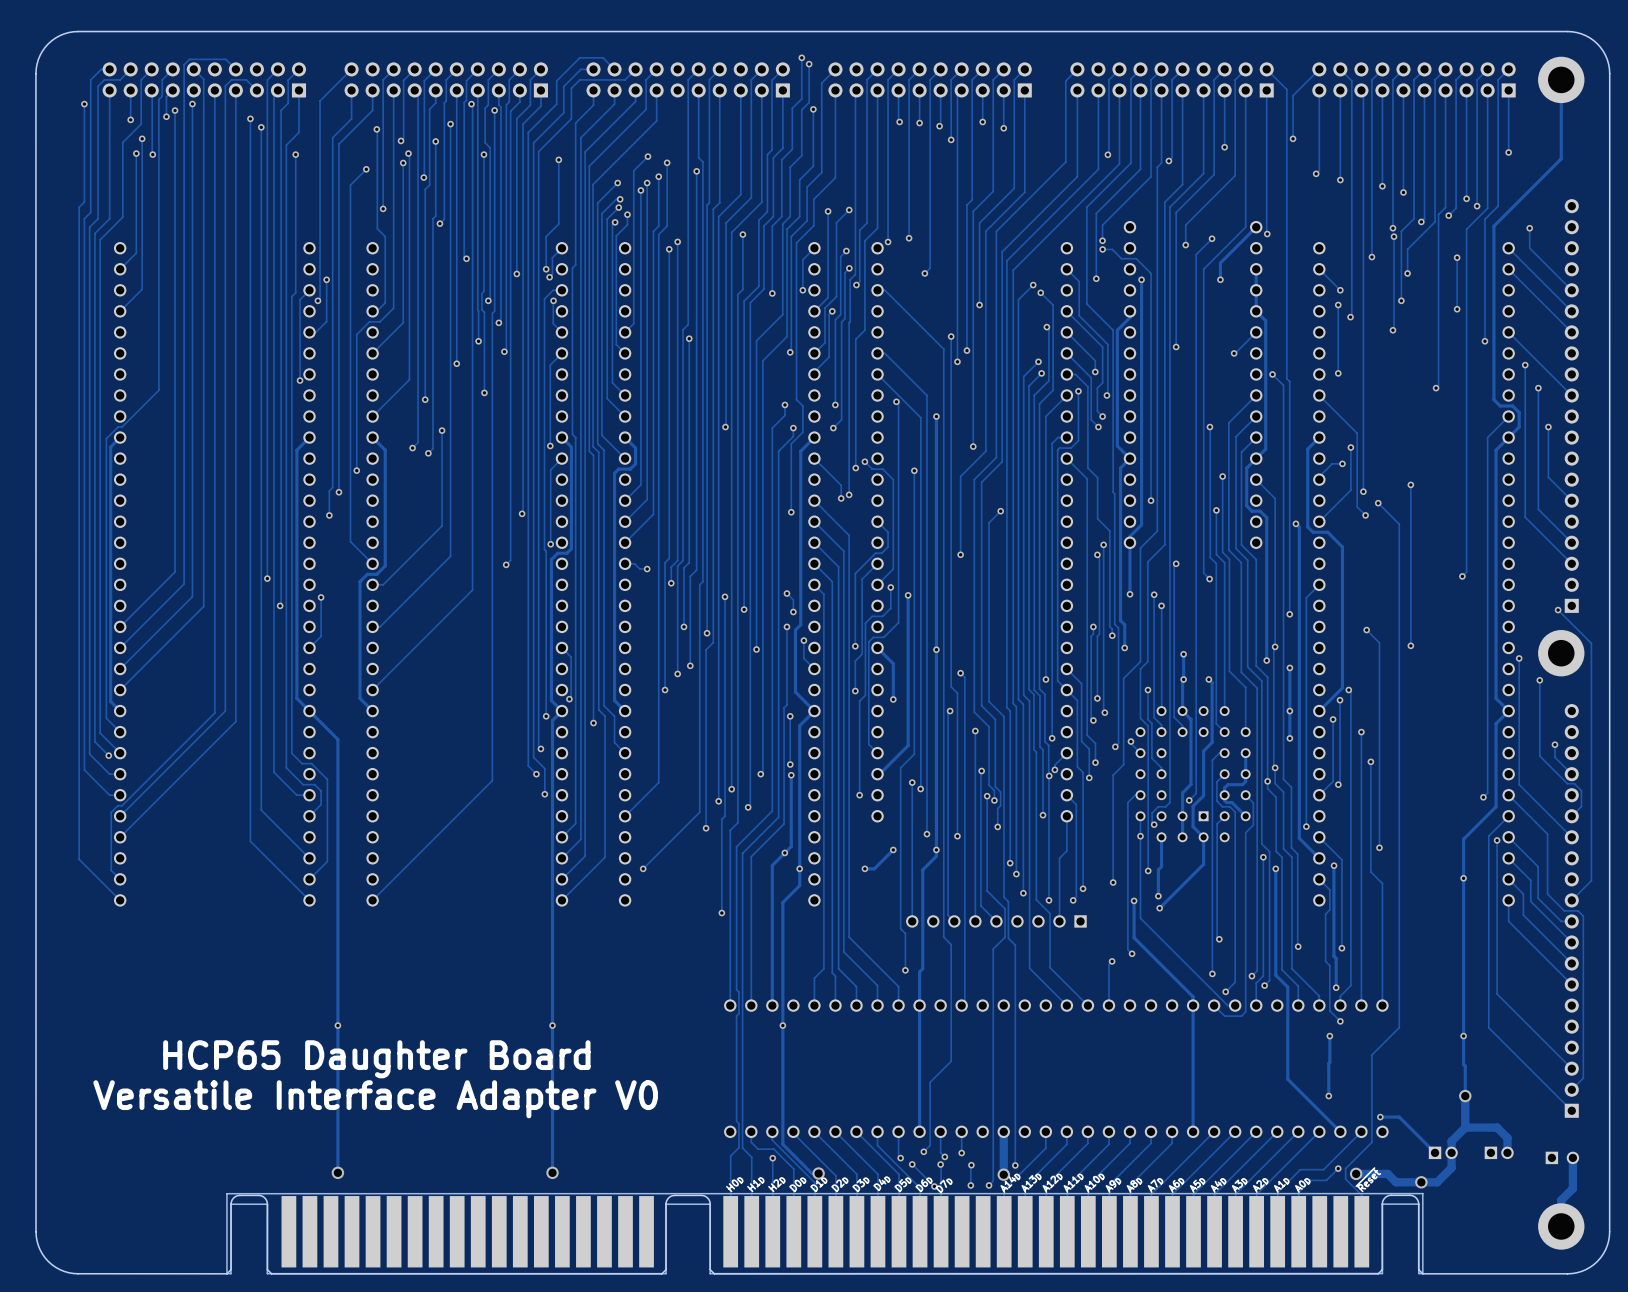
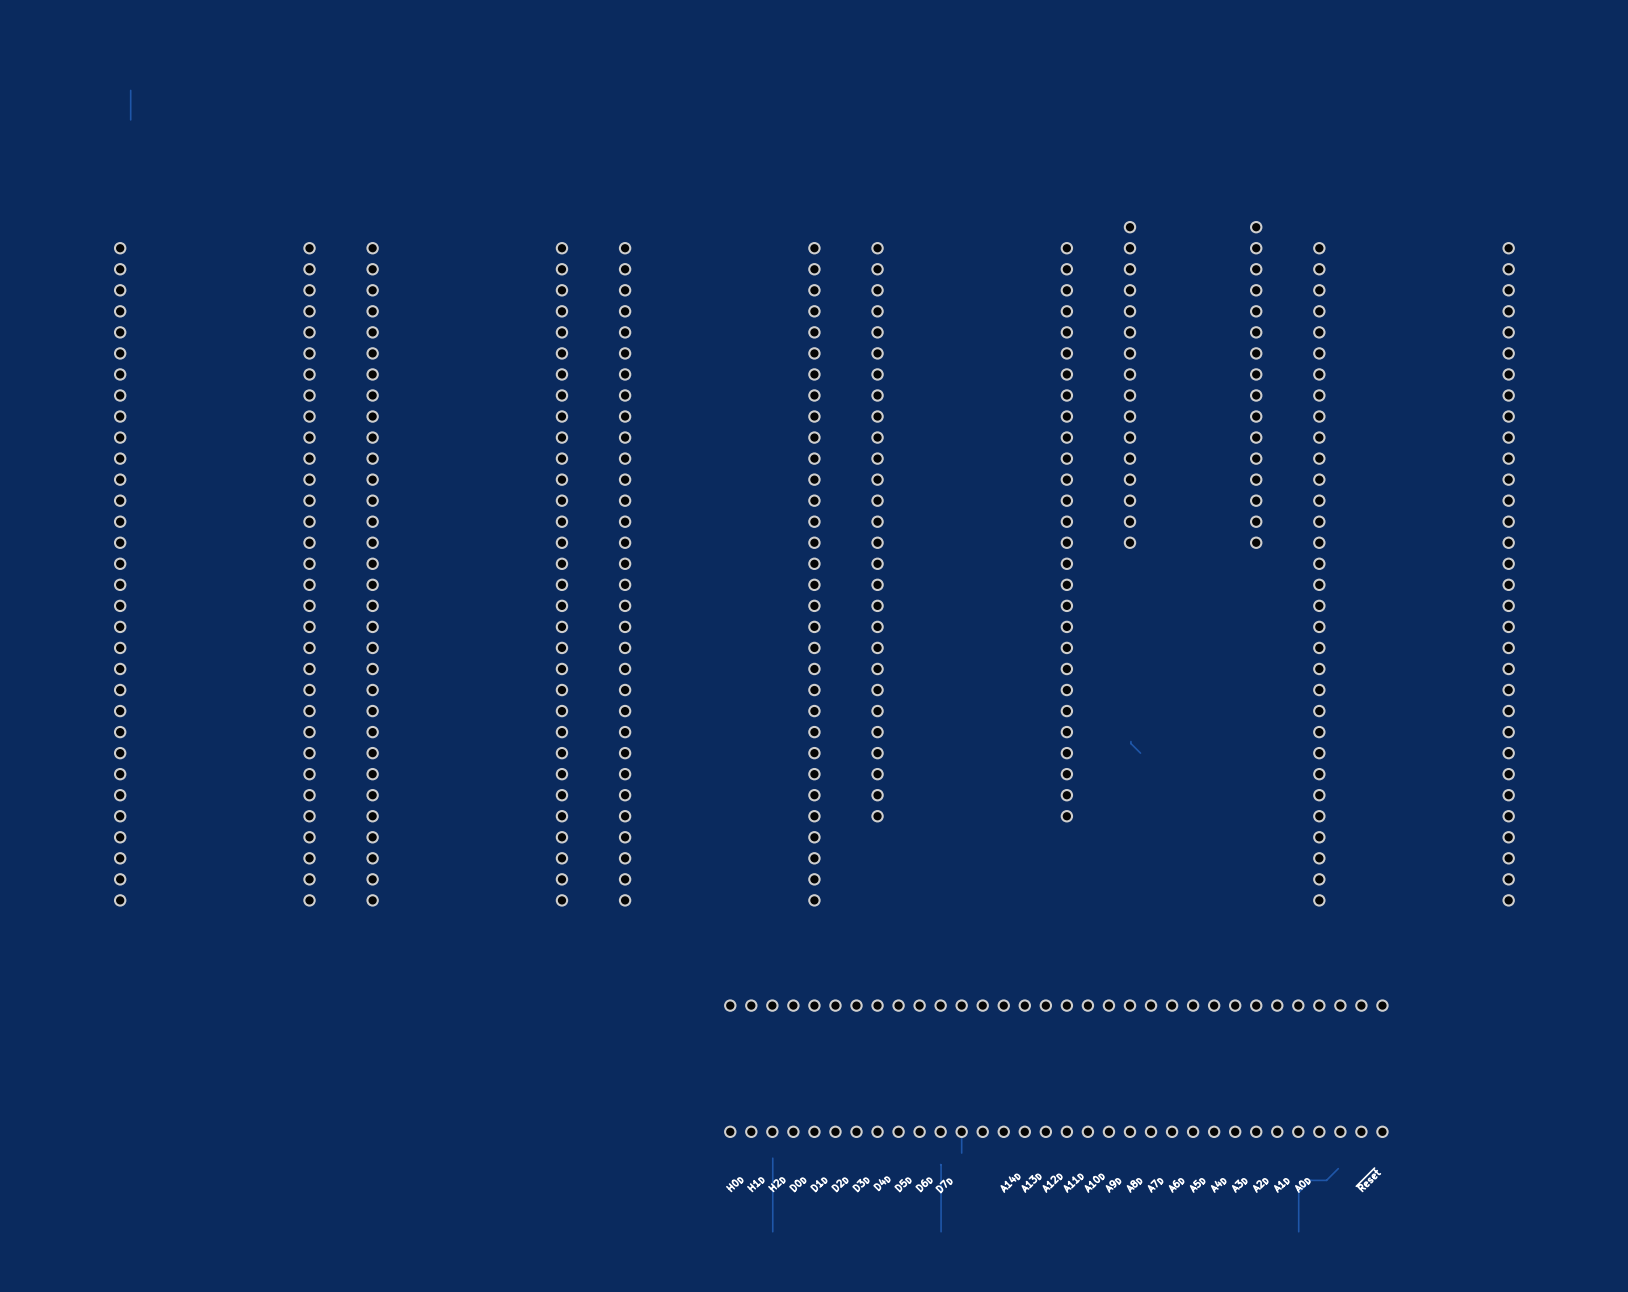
track: (801, 57) (801, 98) (792, 108) (792, 149) (781, 159) (781, 216) (772, 226) (772, 293) -> none
via: (801, 57) -> none
track: (809, 64) (809, 102) (801, 109) (801, 155) (790, 167) (790, 216) (782, 224) (782, 314) (756, 340) (756, 649) -> none
via: (809, 64) -> none
track: (109, 69) (101, 69) (90, 79) (90, 212) (84, 218) (84, 769) (109, 795) (120, 795) -> none
track: (130, 69) (120, 79) (104, 79) (98, 86) (98, 218) (89, 227) (89, 754) (109, 774) (119, 774) -> none
track: (151, 69) (141, 79) (141, 124) (122, 142) (122, 217) (100, 239) (100, 733) (120, 753) -> none
track: (172, 69) (162, 79) (162, 96) (158, 99) (158, 390) (122, 427) (118, 427) (106, 438) (106, 718) (120, 732) -> none
track: (193, 69) (203, 79) (203, 606) (120, 690) -> none
track: (235, 69) (225, 59) (189, 59) (184, 64) (184, 583) (120, 647) -> none
track: (277, 69) (267, 79) (267, 578) -> none
track: (298, 69) (288, 80) (288, 103) (281, 110) (280, 605) -> none
track: (351, 69) (320, 100) (320, 298) (317, 300) -> none
track: (393, 69) (383, 79) (383, 208) -> none
track: (414, 69) (403, 80) (403, 138) (401, 140) -> none
track: (435, 69) (424, 80) (423, 177) -> none
track: (456, 69) (446, 79) (446, 100) (444, 102) (444, 219) (439, 223) -> none
track: (477, 69) (466, 80) (466, 100) (464, 102) (464, 256) (466, 258) -> none
track: (498, 69) (488, 79) (488, 105) (485, 108) (485, 142) (490, 147) (490, 298) (488, 300) -> none
track: (519, 69) (509, 80) (509, 102) (506, 104) (506, 349) (504, 351) -> none
track: (540, 69) (530, 79) (530, 105) (516, 118) (516, 273) -> none
track: (593, 69) (580, 69) (563, 86) (563, 112) (533, 142) (533, 757) (544, 768) (544, 794) -> none
track: (614, 69) (602, 57) (579, 57) (556, 80) (556, 104) (528, 132) (528, 766) (536, 774) -> none
track: (635, 69) (625, 79) (579, 79) (571, 88) (571, 118) (538, 151) (538, 746) (540, 748) -> none
track: (656, 69) (646, 79) (646, 109) (589, 166) (589, 451) (593, 455) (593, 723) -> none
track: (698, 69) (688, 79) (688, 324) (683, 329) (683, 560) (677, 566) (677, 673) -> none
track: (719, 69) (709, 79) (709, 202) (707, 205) (707, 633) -> none
track: (761, 69) (751, 79) (751, 197) (726, 222) (725, 427) -> none
track: (782, 69) (772, 80) (772, 150) (767, 154) (767, 211) (758, 220) (758, 286) (744, 301) (744, 609) -> none
track: (835, 69) (821, 83) (821, 172) (807, 187) (807, 220) (791, 236) (790, 352) -> none
track: (877, 69) (867, 79) (867, 223) (859, 230) (859, 281) (856, 285) -> none
track: (898, 69) (888, 79) (888, 242) -> none
track: (919, 69) (909, 79) (909, 238) -> none
track: (940, 69) (930, 79) (930, 268) (924, 273) -> none
track: (961, 69) (951, 79) (951, 139) -> none
track: (982, 69) (972, 79) (972, 199) (966, 205) (966, 350) -> none
track: (1003, 69) (993, 79) (993, 191) (973, 211) (973, 446) -> none
track: (1024, 69) (1014, 79) (1014, 188) (979, 222) (979, 305) -> none
track: (1077, 69) (1065, 80) (1065, 161) (996, 231) (996, 457) (974, 479) (974, 712) (989, 726) (989, 785) (994, 790) (994, 800) -> none
track: (1119, 69) (1108, 79) (1107, 154) -> none
track: (1140, 69) (1130, 78) (1130, 163) (1086, 207) (1086, 303) (1113, 330) (1114, 624) (1118, 628) (1118, 743) (1115, 746) -> none
track: (1161, 69) (1151, 79) (1151, 176) (1102, 225) (1102, 240) -> none
track: (1182, 69) (1172, 79) (1172, 157) (1168, 161) -> none
track: (1224, 69) (1214, 79) (1214, 174) (1176, 212) (1176, 347) -> none
track: (1245, 69) (1235, 79) (1235, 175) (1185, 225) (1185, 245) -> none
track: (1266, 69) (1286, 89) (1286, 378) (1289, 381) (1289, 614) -> none
track: (1319, 69) (1293, 95) (1293, 138) -> none
track: (1340, 69) (1351, 80) (1350, 317) -> none
track: (1382, 69) (1371, 79) (1371, 257) -> none
track: (1403, 69) (1392, 79) (1392, 228) -> none
track: (1424, 69) (1414, 79) (1414, 218) (1401, 231) (1401, 300) -> none
track: (1445, 69) (1435, 79) (1435, 221) (1407, 249) (1407, 273) -> none
track: (1466, 69) (1456, 79) (1456, 208) (1448, 215) -> none
track: (1487, 69) (1477, 79) (1477, 206) -> none
track: (1508, 69) (1498, 79) (1498, 206) (1484, 219) (1484, 341) -> none
part: (204, 79) -> none
part: (446, 79) -> none
part: (688, 79) -> none
part: (930, 79) -> none
part: (1172, 79) -> none
part: (1414, 79) -> none
track: (1561, 79) (1561, 158) (1493, 226) (1493, 399) (1500, 406) (1512, 406) (1519, 412) (1519, 427) (1496, 450) (1496, 698) (1508, 711) (1496, 723) (1496, 806) (1463, 839) (1465, 1127) -> none
part: (1561, 79) -> none
track: (109, 90) (109, 218) (94, 233) (94, 741) (108, 755) -> none
track: (152, 90) (152, 154) -> none
track: (172, 90) (166, 96) (166, 116) -> none
track: (214, 90) (214, 713) (122, 805) (117, 805) (111, 812) (111, 870) (120, 879) -> none
track: (235, 90) (235, 721) (120, 837) -> none
track: (256, 90) (246, 79) (231, 79) (225, 86) (225, 711) (120, 816) -> none
track: (298, 90) (298, 132) (286, 145) (286, 767) (303, 784) (314, 784) (321, 791) (321, 804) (309, 816) -> none
track: (351, 90) (351, 118) (332, 137) (332, 487) (329, 490) (329, 515) -> none
track: (372, 90) (372, 110) (338, 144) (338, 492) -> none
track: (393, 90) (393, 308) (379, 321) (369, 321) (356, 334) (356, 470) -> none
track: (435, 90) (435, 103) (429, 109) (429, 185) (425, 189) (425, 399) -> none
track: (456, 90) (456, 363) -> none
track: (477, 90) (478, 341) -> none
track: (498, 90) (498, 105) (500, 107) (500, 320) (498, 322) -> none
track: (519, 90) (519, 102) (510, 111) (510, 560) (506, 564) -> none
track: (593, 90) (593, 105) (575, 123) (575, 265) (572, 268) (572, 434) (575, 437) (575, 823) (561, 837) -> none
track: (614, 90) (614, 104) (580, 137) (580, 839) (561, 858) -> none
track: (635, 90) (635, 101) (585, 151) (585, 856) (561, 879) -> none
track: (656, 90) (656, 120) (593, 184) (593, 446) (598, 452) (598, 709) (605, 716) (605, 857) (561, 900) -> none
track: (698, 90) (698, 157) (702, 161) (702, 581) (699, 584) (699, 812) (643, 868) -> none
track: (719, 90) (719, 202) (713, 209) (713, 642) (706, 649) (706, 828) -> none
track: (740, 90) (740, 194) (718, 216) (718, 801) -> none
track: (761, 90) (761, 202) (731, 232) (731, 789) -> none
track: (782, 90) (782, 148) (773, 157) (773, 216) (763, 226) (763, 289) (750, 302) (750, 805) (748, 807) -> none
track: (835, 90) (835, 177) (813, 199) (813, 225) (796, 242) (796, 399) (802, 406) (802, 432) (791, 443) (791, 512) -> none
track: (877, 90) (877, 228) (864, 240) (864, 330) (855, 339) (855, 468) -> none
track: (898, 90) (899, 121) -> none
track: (919, 90) (919, 123) -> none
track: (940, 90) (939, 126) -> none
track: (982, 90) (982, 121) -> none
track: (1003, 90) (1003, 128) -> none
track: (1024, 90) (1024, 192) (985, 231) (985, 451) (960, 476) (960, 554) -> none
track: (1077, 90) (1077, 176) (1002, 251) (1002, 461) (981, 482) (981, 705) (995, 719) (995, 786) (1000, 792) (1000, 805) (997, 808) (997, 826) -> none
track: (1098, 90) (1098, 169) (1006, 260) (1006, 707) (1010, 710) (1010, 863) -> none
track: (1119, 90) (1119, 164) (1013, 270) (1013, 703) (1016, 706) (1016, 874) -> none
track: (1140, 90) (1140, 169) (1096, 213) (1096, 278) -> none
track: (1161, 90) (1161, 163) (1157, 167) (1157, 531) (1140, 548) (1140, 661) (1123, 678) (1123, 764) (1113, 775) (1113, 882) -> none
track: (1182, 90) (1182, 184) (1164, 202) (1164, 544) (1147, 561) (1147, 661) (1140, 668) (1140, 718) (1148, 726) (1148, 870) -> none
track: (1203, 90) (1203, 173) (1169, 207) (1169, 802) (1165, 806) (1158, 806) (1152, 813) (1152, 822) (1154, 824) -> none
track: (1224, 90) (1224, 147) -> none
track: (1245, 90) (1245, 227) (1203, 269) (1203, 573) (1209, 579) -> none
track: (1266, 90) (1267, 234) -> none
track: (1319, 90) (1319, 170) (1316, 173) -> none
track: (1340, 90) (1340, 180) -> none
track: (1382, 90) (1382, 186) -> none
track: (1403, 90) (1403, 192) -> none
track: (1424, 90) (1424, 218) (1421, 221) -> none
track: (1445, 90) (1445, 207) (1438, 214) (1438, 385) (1436, 388) -> none
track: (1466, 90) (1466, 198) -> none
track: (1487, 90) (1487, 208) (1466, 229) (1466, 572) (1462, 576) -> none
track: (1508, 90) (1508, 152) -> none
track: (855, 91) (855, 274) (850, 279) (849, 494) -> none
track: (1363, 92) (1363, 491) -> none
track: (418, 93) (418, 442) (412, 448) -> none
track: (273, 94) (273, 772) (296, 795) (309, 795) -> none
track: (957, 94) (957, 361) -> none
track: (540, 95) (540, 106) (523, 124) (522, 513) -> none
track: (84, 104) (84, 201) (79, 207) (79, 859) (120, 900) -> none
via: (84, 104) -> none
track: (192, 104) (192, 596) (120, 668) -> none
via: (192, 104) -> none
track: (471, 104) (472, 590) (372, 690) -> none
via: (471, 104) -> none
track: (813, 109) (813, 166) (799, 179) (799, 216) (787, 229) (787, 336) (762, 360) (762, 772) (760, 774) -> none
via: (813, 109) -> none
track: (175, 110) (175, 572) (120, 626) -> none
via: (175, 110) -> none
track: (494, 110) (494, 311) (492, 313) (492, 780) (372, 900) -> none
via: (494, 110) -> none
via: (166, 116) -> none
track: (250, 118) (250, 841) (309, 900) -> none
via: (250, 118) -> none
via: (130, 119) -> none
via: (899, 121) -> none
via: (982, 121) -> none
via: (919, 123) -> none
track: (450, 124) (450, 556) (379, 626) (372, 626) -> none
via: (450, 124) -> none
via: (939, 126) -> none
track: (261, 127) (261, 810) (309, 858) -> none
via: (261, 127) -> none
via: (1003, 128) -> none
track: (376, 129) (377, 228) (385, 236) (385, 302) (376, 311) -> none
via: (376, 129) -> none
track: (142, 138) (142, 289) (120, 311) -> none
via: (142, 138) -> none
via: (1293, 138) -> none
via: (951, 139) -> none
via: (401, 140) -> none
track: (435, 141) (435, 216) (432, 218) (432, 448) (428, 453) -> none
via: (435, 141) -> none
via: (1224, 147) -> none
via: (1508, 152) -> none
track: (136, 153) (136, 253) (120, 269) -> none
via: (136, 153) -> none
track: (408, 153) (409, 379) (372, 416) -> none
via: (408, 153) -> none
via: (152, 154) -> none
track: (295, 154) (295, 292) (291, 296) (291, 753) (302, 763) (311, 763) (327, 779) (327, 861) (309, 879) -> none
via: (295, 154) -> none
track: (483, 154) (483, 291) (481, 293) (481, 309) (484, 312) (484, 392) -> none
via: (483, 154) -> none
via: (1107, 154) -> none
track: (647, 156) (633, 170) (633, 323) (625, 332) -> none
via: (647, 156) -> none
track: (558, 159) (558, 224) (546, 236) (546, 269) -> none
via: (558, 159) -> none
via: (1168, 161) -> none
track: (667, 162) (667, 226) (658, 234) (658, 782) (625, 816) -> none
via: (667, 162) -> none
track: (403, 163) (403, 322) (372, 353) -> none
via: (403, 163) -> none
track: (366, 169) (350, 185) (350, 541) (372, 563) -> none
via: (366, 169) -> none
track: (696, 171) (696, 570) (690, 576) (690, 665) -> none
via: (696, 171) -> none
via: (1316, 173) -> none
track: (658, 176) (658, 226) (653, 231) (653, 514) (625, 542) -> none
via: (658, 176) -> none
via: (423, 177) -> none
via: (1340, 180) -> none
track: (617, 183) (597, 202) (597, 443) (604, 450) (604, 705) (614, 716) (614, 742) (625, 753) -> none
via: (617, 183) -> none
track: (647, 183) (647, 499) (625, 521) -> none
via: (647, 183) -> none
via: (1382, 186) -> none
track: (640, 190) (640, 484) (625, 500) -> none
via: (640, 190) -> none
via: (1403, 192) -> none
via: (1466, 198) -> none
track: (620, 199) (616, 199) (601, 213) (601, 435) (625, 458) -> none
via: (620, 199) -> none
via: (1477, 206) -> none
track: (618, 207) (607, 219) (607, 398) (625, 416) -> none
via: (618, 207) -> none
via: (383, 208) -> none
track: (849, 210) (836, 222) (836, 296) (824, 308) (824, 342) (814, 353) -> none
via: (849, 210) -> none
track: (828, 211) (828, 297) (814, 311) -> none
via: (828, 211) -> none
track: (627, 214) (627, 224) (616, 235) (616, 344) (625, 353) -> none
via: (627, 214) -> none
via: (1448, 215) -> none
via: (1421, 221) -> none
track: (615, 222) (612, 225) (612, 382) (625, 395) -> none
via: (615, 222) -> none
via: (439, 223) -> none
track: (1256, 227) (1220, 262) (1220, 279) -> none
via: (1392, 228) -> none
track: (1529, 228) (1529, 248) (1571, 290) -> none
via: (1529, 228) -> none
track: (742, 234) (742, 289) (737, 294) (737, 822) (730, 830) (730, 1005) -> none
via: (742, 234) -> none
via: (1267, 234) -> none
track: (1394, 236) (1392, 330) -> none
via: (1394, 236) -> none
via: (909, 238) -> none
track: (1212, 238) (1196, 254) (1196, 793) (1189, 800) -> none
via: (1212, 238) -> none
via: (1102, 240) -> none
track: (677, 241) (677, 560) (671, 567) (671, 583) -> none
via: (677, 241) -> none
via: (888, 242) -> none
via: (1185, 245) -> none
track: (561, 248) (552, 257) (552, 274) (549, 277) -> none
track: (814, 248) (802, 259) (802, 290) -> none
track: (1508, 248) (1571, 311) -> none
track: (669, 249) (669, 558) (665, 562) (665, 690) -> none
via: (669, 249) -> none
track: (1102, 249) (1112, 249) (1121, 258) (1136, 258) (1151, 273) (1151, 500) -> none
via: (1102, 249) -> none
track: (846, 251) (840, 256) (840, 314) (835, 319) (835, 404) -> none
via: (846, 251) -> none
via: (1371, 257) -> none
track: (1457, 257) (1457, 309) -> none
via: (1457, 257) -> none
via: (466, 258) -> none
track: (849, 268) (844, 272) (844, 318) (841, 322) (841, 419) (833, 428) -> none
via: (849, 268) -> none
via: (546, 269) -> none
track: (1066, 269) (1079, 281) (1079, 315) (1107, 344) (1106, 395) -> none
track: (1256, 269) (1256, 311) (1265, 320) (1265, 449) (1246, 468) (1246, 505) (1252, 511) (1260, 511) (1266, 517) (1266, 660) -> none
track: (1319, 269) (1340, 290) -> none
track: (1508, 269) (1571, 332) -> none
via: (516, 273) -> none
via: (924, 273) -> none
via: (1407, 273) -> none
via: (549, 277) -> none
via: (1096, 278) -> none
track: (326, 279) (326, 321) (315, 332) (309, 332) -> none
via: (326, 279) -> none
track: (1141, 279) (1141, 524) (1129, 536) (1129, 594) -> none
via: (1141, 279) -> none
via: (1220, 279) -> none
via: (856, 285) -> none
track: (1033, 285) (1018, 299) (1018, 699) (1023, 704) (1023, 893) -> none
via: (1033, 285) -> none
track: (309, 290) (300, 299) (300, 380) -> none
track: (561, 290) (553, 290) (544, 298) (546, 716) -> none
via: (802, 290) -> none
track: (877, 290) (884, 290) (943, 349) (943, 937) (951, 944) (951, 1061) (930, 1082) (930, 1145) (923, 1151) -> none
via: (1340, 290) -> none
track: (1040, 292) (1053, 305) (1053, 390) (1039, 403) (1039, 688) (1044, 694) (1044, 741) (1048, 745) (1048, 900) -> none
via: (1040, 292) -> none
via: (772, 293) -> none
via: (317, 300) -> none
via: (488, 300) -> none
track: (553, 300) (553, 323) (561, 332) -> none
via: (553, 300) -> none
via: (1401, 300) -> none
via: (979, 305) -> none
track: (1338, 305) (1338, 373) -> none
via: (1338, 305) -> none
via: (1457, 309) -> none
track: (832, 311) (829, 314) (829, 357) (814, 371) -> none
via: (832, 311) -> none
track: (1066, 311) (1102, 347) (1102, 382) (1097, 388) (1097, 411) (1102, 416) -> none
track: (1129, 311) (1129, 317) (1117, 330) (1117, 445) (1129, 458) (1120, 468) (1120, 620) (1124, 624) (1124, 647) -> none
via: (1350, 317) -> none
via: (498, 322) -> none
track: (1046, 327) (1048, 329) (1048, 380) (1034, 395) (1034, 690) (1039, 695) (1039, 746) (1043, 749) (1043, 815) -> none
via: (1046, 327) -> none
via: (1392, 330) -> none
track: (1066, 332) (1095, 360) (1095, 371) -> none
track: (1256, 332) (1234, 353) -> none
track: (1508, 332) (1571, 395) -> none
track: (951, 336) (951, 686) (957, 693) (957, 836) -> none
via: (951, 336) -> none
track: (689, 338) (689, 562) (683, 568) (683, 626) -> none
via: (689, 338) -> none
via: (478, 341) -> none
via: (1484, 341) -> none
via: (1176, 347) -> none
via: (966, 350) -> none
via: (504, 351) -> none
via: (790, 352) -> none
track: (561, 353) (550, 365) (550, 445) -> none
track: (877, 353) (884, 353) (926, 395) (926, 834) -> none
track: (1066, 353) (1091, 377) (1091, 419) (1098, 427) -> none
via: (1234, 353) -> none
via: (957, 361) -> none
track: (1038, 361) (1023, 376) (1023, 695) (1029, 701) (1029, 968) (1066, 1005) -> none
via: (1038, 361) -> none
via: (456, 363) -> none
track: (1525, 365) (1525, 517) (1571, 563) -> none
via: (1525, 365) -> none
via: (1095, 371) -> none
track: (1041, 373) (1029, 386) (1029, 689) (1033, 694) (1033, 749) (1036, 752) (1036, 899) (1050, 913) (1050, 967) (1087, 1005) -> none
via: (1041, 373) -> none
via: (1338, 373) -> none
track: (877, 374) (920, 417) (920, 788) -> none
track: (1066, 374) (1075, 374) (1087, 386) (1087, 468) (1097, 477) (1097, 518) (1109, 531) (1109, 626) (1112, 629) (1112, 635) -> none
track: (1272, 374) (1283, 385) (1283, 779) (1291, 787) (1291, 847) (1297, 854) (1298, 946) -> none
via: (1272, 374) -> none
via: (300, 380) -> none
via: (1436, 388) -> none
track: (1538, 388) (1538, 509) (1571, 542) -> none
via: (1538, 388) -> none
track: (1078, 391) (1078, 440) (1071, 448) (1059, 448) (1057, 449) (1057, 680) (1077, 700) (1077, 766) (1083, 772) (1083, 888) -> none
via: (1078, 391) -> none
via: (484, 392) -> none
track: (1066, 395) (1045, 416) (1045, 679) -> none
via: (1106, 395) -> none
track: (1256, 395) (1228, 422) (1228, 550) (1241, 562) (1241, 672) (1257, 688) (1257, 970) (1251, 976) -> none
track: (1319, 395) (1357, 433) (1357, 506) (1365, 515) -> none
via: (425, 399) -> none
track: (896, 401) (898, 403) (898, 622) (883, 637) (873, 637) (868, 641) (868, 744) (877, 753) -> none
via: (896, 401) -> none
track: (784, 404) (784, 415) (772, 428) (772, 810) (736, 846) (736, 989) (738, 992) (738, 1013) (736, 1016) (736, 1121) (738, 1123) (738, 1147) (730, 1156) (730, 1231) -> none
via: (784, 404) -> none
via: (835, 404) -> none
part: (1571, 406) -> none
track: (936, 416) (936, 856) (922, 869) (922, 968) (919, 971) (919, 1131) -> none
via: (936, 416) -> none
via: (1102, 416) -> none
track: (1256, 416) (1236, 436) (1236, 548) (1247, 560) (1247, 666) (1261, 681) (1261, 843) (1269, 851) (1269, 980) (1264, 985) -> none
track: (1508, 416) (1487, 437) (1487, 793) (1483, 797) -> none
via: (725, 427) -> none
via: (1098, 427) -> none
track: (1209, 427) (1210, 557) (1216, 563) (1216, 723) (1224, 732) -> none
via: (1209, 427) -> none
track: (1548, 427) (1548, 477) (1571, 500) -> none
via: (1548, 427) -> none
track: (793, 428) (793, 436) (778, 451) (778, 817) (742, 853) (742, 1148) (751, 1157) (751, 1231) -> none
via: (793, 428) -> none
via: (833, 428) -> none
track: (442, 430) (442, 525) (383, 584) (372, 584) -> none
via: (442, 430) -> none
track: (120, 437) (110, 447) (110, 701) (120, 711) -> none
track: (309, 437) (296, 450) (296, 698) (337, 739) (337, 1172) -> none
track: (372, 437) (385, 450) (385, 565) (376, 574) (367, 574) (360, 581) (360, 698) (372, 711) -> none
track: (561, 437) (571, 447) (571, 548) (566, 553) (557, 553) (551, 559) (551, 700) (561, 711) (552, 720) (552, 1172) -> none
track: (625, 437) (635, 448) (635, 463) (630, 469) (618, 469) (614, 473) (614, 700) (625, 711) -> none
track: (814, 437) (800, 451) (800, 624) (795, 630) (795, 692) (814, 711) (799, 725) (799, 885) (782, 902) (782, 1144) (811, 1173) (818, 1173) -> none
track: (1066, 437) (1058, 437) (1052, 443) (1052, 738) -> none
track: (1256, 437) (1241, 452) (1241, 544) (1256, 559) (1256, 665) (1267, 677) (1267, 788) (1276, 797) (1276, 851) (1282, 857) (1282, 969) (1298, 986) (1298, 1005) -> none
track: (1319, 437) (1307, 449) (1307, 526) (1313, 532) (1327, 532) (1342, 546) (1342, 687) (1319, 711) -> none
via: (550, 445) -> none
via: (973, 446) -> none
track: (1350, 447) (1350, 490) (1319, 521) -> none
via: (1350, 447) -> none
via: (412, 448) -> none
via: (428, 453) -> none
track: (561, 458) (550, 469) (550, 544) -> none
track: (814, 458) (841, 485) (841, 498) -> none
track: (1066, 458) (1087, 478) (1087, 735) (1095, 743) (1095, 762) -> none
track: (864, 461) (872, 469) (882, 469) (893, 479) (893, 569) (877, 584) -> none
via: (864, 461) -> none
track: (1342, 463) (1332, 463) (1319, 476) -> none
via: (1342, 463) -> none
via: (855, 468) -> none
via: (356, 470) -> none
track: (914, 470) (914, 754) (900, 767) (900, 928) (905, 933) (905, 970) -> none
via: (914, 470) -> none
track: (1222, 476) (1222, 552) (1229, 559) (1229, 671) (1245, 687) (1245, 732) -> none
via: (1222, 476) -> none
track: (1256, 479) (1275, 498) (1273, 766) (1275, 783) (1283, 792) (1283, 848) (1291, 857) (1291, 968) (1319, 996) (1319, 1005) -> none
track: (1410, 484) (1410, 645) -> none
via: (1410, 484) -> none
via: (1363, 491) -> none
via: (338, 492) -> none
via: (849, 494) -> none
via: (841, 498) -> none
track: (814, 500) (849, 535) (849, 937) (898, 986) (898, 1005) -> none
via: (1151, 500) -> none
track: (1378, 503) (1399, 524) (1399, 1027) (1371, 1055) (1371, 1142) (1345, 1168) (1345, 1179) (1361, 1195) (1361, 1231) -> none
via: (1378, 503) -> none
track: (1216, 510) (1216, 554) (1224, 562) (1224, 711) -> none
via: (1216, 510) -> none
track: (1000, 511) (989, 522) (989, 701) (1003, 716) (1003, 897) (1008, 901) (1008, 938) (1015, 945) (1015, 1165) -> none
via: (1000, 511) -> none
via: (791, 512) -> none
via: (522, 513) -> none
via: (329, 515) -> none
via: (1365, 515) -> none
track: (814, 521) (843, 551) (843, 951) (877, 985) (877, 1005) -> none
track: (877, 521) (888, 532) (888, 546) (881, 553) (875, 553) (855, 573) (855, 646) -> none
track: (1295, 523) (1299, 527) (1299, 838) (1319, 858) -> none
via: (1295, 523) -> none
track: (814, 542) (838, 566) (838, 968) (856, 986) (856, 1005) -> none
via: (550, 544) -> none
track: (1103, 544) (1104, 712) -> none
via: (1103, 544) -> none
via: (960, 554) -> none
track: (1097, 554) (1099, 556) (1097, 698) -> none
via: (1097, 554) -> none
track: (625, 563) (634, 563) (639, 569) (647, 569) -> none
track: (814, 563) (832, 581) (832, 972) (835, 976) (835, 1005) -> none
track: (877, 563) (862, 579) (862, 654) (855, 661) (855, 691) -> none
track: (1176, 563) (1174, 565) (1174, 717) (1182, 725) (1182, 732) -> none
via: (1176, 563) -> none
via: (506, 564) -> none
via: (647, 569) -> none
via: (1462, 576) -> none
via: (267, 578) -> none
via: (1209, 579) -> none
via: (671, 583) -> none
track: (814, 584) (823, 594) (823, 968) (814, 978) (814, 1005) -> none
track: (1319, 584) (1306, 597) (1306, 826) -> none
track: (890, 587) (890, 608) (882, 616) (872, 616) (865, 623) (865, 695) (859, 701) (859, 795) -> none
via: (890, 587) -> none
track: (786, 593) (793, 599) (793, 611) -> none
via: (786, 593) -> none
via: (1129, 594) -> none
track: (1154, 594) (1154, 717) (1161, 725) (1161, 732) -> none
via: (1154, 594) -> none
track: (908, 595) (908, 745) (879, 774) -> none
via: (908, 595) -> none
track: (725, 596) (725, 816) (721, 819) (721, 913) -> none
via: (725, 596) -> none
track: (321, 597) (321, 636) (309, 647) -> none
via: (321, 597) -> none
via: (280, 605) -> none
track: (1161, 605) (1161, 710) -> none
via: (1161, 605) -> none
via: (744, 609) -> none
track: (1558, 610) (1591, 643) (1591, 880) (1571, 900) -> none
via: (1558, 610) -> none
via: (793, 611) -> none
via: (1289, 614) -> none
via: (683, 626) -> none
track: (786, 626) (786, 705) (784, 707) (784, 823) (751, 856) (751, 1005) -> none
via: (786, 626) -> none
track: (1093, 626) (1093, 634) (1091, 636) (1091, 718) (1093, 720) -> none
via: (1093, 626) -> none
track: (1366, 630) (1379, 642) (1379, 847) -> none
via: (1366, 630) -> none
via: (707, 633) -> none
via: (1112, 635) -> none
track: (803, 640) (803, 658) (814, 668) -> none
via: (803, 640) -> none
via: (1410, 645) -> none
via: (855, 646) -> none
via: (1275, 646) -> none
track: (561, 647) (571, 657) (571, 697) (569, 699) -> none
track: (877, 647) (893, 663) (893, 699) -> none
via: (1124, 647) -> none
via: (756, 649) -> none
via: (936, 649) -> none
part: (1561, 653) -> none
track: (1183, 654) (1182, 711) (1190, 719) (1190, 784) (1182, 792) (1182, 837) -> none
via: (1183, 654) -> none
track: (1519, 658) (1519, 784) (1571, 837) -> none
via: (1519, 658) -> none
via: (1266, 660) -> none
via: (690, 665) -> none
track: (1289, 667) (1289, 738) -> none
via: (1289, 667) -> none
track: (1066, 668) (1081, 683) (1081, 741) (1089, 749) (1089, 777) -> none
via: (677, 673) -> none
track: (960, 673) (964, 677) (964, 1002) -> none
via: (960, 673) -> none
via: (1045, 679) -> none
via: (1183, 679) -> none
track: (1208, 679) (1212, 682) (1212, 742) (1203, 751) (1203, 795) (1193, 806) (1193, 826) (1203, 837) (1203, 864) (1159, 908) -> none
via: (1208, 679) -> none
track: (1539, 680) (1539, 756) (1567, 783) (1574, 783) (1581, 790) (1581, 806) (1571, 816) -> none
via: (1539, 680) -> none
via: (665, 690) -> none
track: (1147, 690) (1147, 719) (1151, 723) (1151, 758) (1161, 767) (1161, 774) -> none
via: (1147, 690) -> none
track: (1348, 690) (1350, 692) (1350, 985) (1340, 996) (1340, 1005) -> none
via: (1348, 690) -> none
via: (855, 691) -> none
via: (1097, 698) -> none
via: (569, 699) -> none
via: (893, 699) -> none
track: (1340, 700) (1340, 783) (1338, 784) -> none
via: (1340, 700) -> none
track: (950, 711) (948, 713) (948, 915) (954, 921) -> none
via: (950, 711) -> none
via: (1289, 711) -> none
via: (1104, 712) -> none
via: (546, 716) -> none
track: (790, 716) (790, 764) -> none
via: (790, 716) -> none
track: (1333, 719) (1333, 781) (1319, 795) -> none
via: (1333, 719) -> none
via: (1093, 720) -> none
via: (593, 723) -> none
track: (975, 731) (975, 921) -> none
via: (975, 731) -> none
track: (1361, 732) (1361, 1005) -> none
via: (1361, 732) -> none
via: (1052, 738) -> none
via: (1289, 738) -> none
via: (1130, 741) -> none
track: (1554, 744) (1554, 757) (1571, 774) -> none
via: (1554, 744) -> none
via: (1115, 746) -> none
via: (540, 748) -> none
track: (1066, 753) (1054, 765) (1054, 769) -> none
track: (1224, 753) (1219, 753) (1212, 760) (1212, 973) -> none
track: (1245, 753) (1245, 781) (1242, 784) (1227, 784) (1224, 787) (1224, 800) (1232, 802) (1245, 816) -> none
via: (108, 755) -> none
track: (1370, 761) (1370, 871) (1382, 883) (1382, 1005) -> none
via: (1370, 761) -> none
via: (1095, 762) -> none
via: (790, 764) -> none
via: (1275, 767) -> none
via: (1054, 769) -> none
track: (981, 771) (980, 905) (996, 921) -> none
via: (981, 771) -> none
via: (536, 774) -> none
via: (760, 774) -> none
part: (1193, 774) -> none
track: (1224, 774) (1216, 781) (1216, 801) (1222, 806) (1229, 806) (1235, 812) (1235, 982) (1225, 991) -> none
track: (791, 775) (791, 846) (772, 865) (772, 1005) -> none
via: (791, 775) -> none
via: (1049, 776) -> none
via: (1089, 777) -> none
via: (1267, 781) -> none
track: (912, 782) (912, 921) -> none
via: (912, 782) -> none
via: (1338, 784) -> none
via: (920, 788) -> none
via: (731, 789) -> none
via: (544, 794) -> none
via: (859, 795) -> none
track: (1066, 795) (1076, 804) (1076, 897) (1073, 900) -> none
track: (1140, 795) (1135, 795) (1127, 802) (1127, 949) (1132, 953) -> none
track: (1245, 795) (1253, 802) (1253, 825) (1245, 832) (1245, 1011) (1241, 1016) (1224, 1016) (1214, 1005) -> none
track: (1508, 795) (1535, 822) -> none
track: (987, 796) (987, 890) (1005, 908) (1005, 937) (993, 949) (993, 1181) (989, 1185) -> none
via: (987, 796) -> none
via: (1483, 797) -> none
via: (994, 800) -> none
via: (1189, 800) -> none
via: (718, 801) -> none
via: (748, 807) -> none
via: (1043, 815) -> none
track: (1066, 816) (1066, 850) (1059, 858) (1059, 921) -> none
track: (1140, 816) (1140, 918) (1227, 1005) (1235, 1005) -> none
track: (1224, 816) (1217, 823) (1217, 937) (1219, 939) -> none
track: (1508, 816) (1488, 836) (1488, 1027) (1571, 1110) -> none
track: (1535, 822) (1547, 834) (1547, 894) (1564, 910) (1578, 910) (1583, 916) (1583, 1078) (1571, 1089) -> none
via: (1154, 824) -> none
via: (997, 826) -> none
via: (1306, 826) -> none
via: (706, 828) -> none
via: (926, 834) -> none
via: (957, 836) -> none
via: (1140, 836) -> none
track: (1161, 837) (1161, 866) (1158, 869) (1158, 896) -> none
track: (1319, 837) (1341, 859) (1341, 948) -> none
track: (1508, 837) (1538, 866) (1538, 898) (1561, 921) (1571, 921) -> none
track: (1497, 840) (1497, 994) (1571, 1068) -> none
via: (1497, 840) -> none
via: (1379, 847) -> none
track: (893, 849) (874, 868) (864, 868) -> none
via: (893, 849) -> none
via: (936, 849) -> none
via: (784, 852) -> none
track: (1263, 857) (1263, 975) (1256, 983) (1256, 1005) -> none
via: (1263, 857) -> none
track: (1508, 858) (1530, 880) (1530, 901) (1571, 942) -> none
via: (1010, 863) -> none
track: (1334, 865) (1333, 956) (1336, 958) (1336, 987) -> none
via: (1334, 865) -> none
via: (643, 868) -> none
via: (799, 868) -> none
via: (864, 868) -> none
track: (1275, 868) (1275, 975) (1287, 987) (1287, 1079) (1340, 1131) -> none
via: (1275, 868) -> none
via: (1148, 870) -> none
via: (1016, 874) -> none
via: (1463, 878) -> none
track: (1319, 879) (1329, 889) (1329, 909) (1325, 914) (1325, 961) (1329, 965) (1329, 1010) (1340, 1021) -> none
track: (1508, 879) (1523, 894) (1523, 915) (1571, 963) -> none
via: (1113, 882) -> none
via: (1083, 888) -> none
via: (1023, 893) -> none
via: (1158, 896) -> none
via: (1048, 900) -> none
via: (1073, 900) -> none
track: (1134, 900) (1134, 937) (1193, 996) (1193, 1131) -> none
via: (1134, 900) -> none
track: (1508, 900) (1508, 921) (1571, 984) -> none
via: (1159, 908) -> none
part: (1571, 910) -> none
via: (721, 913) -> none
part: (996, 921) -> none
via: (1219, 939) -> none
via: (1298, 946) -> none
via: (1341, 948) -> none
via: (1132, 953) -> none
track: (1112, 961) (1108, 964) (1108, 1005) -> none
via: (1112, 961) -> none
via: (905, 970) -> none
via: (1212, 973) -> none
via: (1251, 976) -> none
via: (1264, 985) -> none
via: (1336, 987) -> none
via: (1225, 991) -> none
via: (1340, 1021) -> none
via: (337, 1025) -> none
via: (552, 1025) -> none
via: (782, 1025) -> none
track: (1329, 1036) (1328, 1096) -> none
via: (1329, 1036) -> none
via: (1463, 1036) -> none
text: HCP65 Daughter Board (376, 1059) -> none
via: (1328, 1096) -> none
via: (1465, 1096) -> none
text: Versatile Interface Adapter V0 (375, 1099) -> none
track: (1380, 1117) (1399, 1117) (1435, 1152) -> none
via: (1380, 1117) -> none
track: (1465, 1127) (1497, 1127) (1507, 1137) (1507, 1148) -> none
track: (1465, 1127) (1451, 1141) (1451, 1167) (1437, 1182) (1396, 1182) (1387, 1173) (1356, 1173) -> none
track: (751, 1131) (751, 1142) (758, 1149) (773, 1149) (793, 1169) (793, 1231) -> none
track: (772, 1131) (772, 1140) (814, 1182) (814, 1231) -> none
track: (814, 1131) (856, 1174) (856, 1231) -> none
track: (835, 1131) (877, 1174) (877, 1231) -> none
track: (856, 1131) (898, 1174) (898, 1231) -> none
track: (898, 1131) (898, 1157) (900, 1158) -> none
track: (940, 1131) (940, 1152) (944, 1156) -> none
track: (1003, 1131) (1003, 1174) -> none
track: (1045, 1131) (1045, 1148) (1004, 1189) (1004, 1231) -> none
track: (1066, 1131) (1066, 1144) (1025, 1186) (1025, 1231) -> none
track: (1087, 1131) (1087, 1143) (1046, 1185) (1046, 1231) -> none
track: (1108, 1131) (1108, 1144) (1067, 1186) (1067, 1231) -> none
track: (1129, 1131) (1129, 1143) (1088, 1185) (1088, 1231) -> none
track: (1151, 1131) (1151, 1143) (1109, 1185) (1109, 1231) -> none
track: (1172, 1131) (1172, 1143) (1130, 1185) (1130, 1231) -> none
track: (1214, 1131) (1151, 1194) (1151, 1231) -> none
track: (1235, 1131) (1172, 1194) (1172, 1231) -> none
track: (1256, 1131) (1193, 1194) (1193, 1231) -> none
track: (1277, 1131) (1214, 1194) (1214, 1231) -> none
track: (1298, 1131) (1235, 1194) (1235, 1231) -> none
track: (1319, 1131) (1256, 1194) (1256, 1231) -> none
track: (1361, 1131) (1323, 1169) (1300, 1169) (1277, 1192) (1277, 1231) -> none
track: (793, 1133) (835, 1175) (835, 1231) -> none
track: (877, 1134) (877, 1145) (920, 1187) (920, 1231) -> none
via: (923, 1151) -> none
part: (1443, 1152) -> none
part: (1499, 1152) -> none
via: (961, 1153) -> none
via: (944, 1156) -> none
part: (1562, 1157) -> none
track: (1572, 1157) (1572, 1188) (1561, 1200) (1561, 1226) -> none
via: (772, 1158) -> none
via: (900, 1158) -> none
track: (912, 1164) (934, 1186) -> none
via: (912, 1164) -> none
via: (940, 1164) -> none
track: (971, 1165) (970, 1185) -> none
via: (971, 1165) -> none
via: (1015, 1165) -> none
via: (1338, 1168) -> none
via: (337, 1172) -> none
via: (552, 1172) -> none
via: (818, 1173) -> none
via: (1356, 1173) -> none
via: (1003, 1174) -> none
via: (1421, 1182) -> none
via: (970, 1185) -> none
via: (989, 1185) -> none
via: (934, 1186) -> none
part: (1561, 1226) -> none
part: (824, 1233) -> none
board edge: (1422, 1273) (1576, 1272) (1589, 1267) (1597, 1261) (1605, 1250) (1609, 1236) (1609, 73) (1605, 55) (1597, 43) (1585, 35) (1567, 31) (73, 31) (59, 35) (48, 43) (40, 55) (35, 73) (36, 1236) (40, 1249) (48, 1261) (55, 1267) (68, 1272) (226, 1273) -> none

